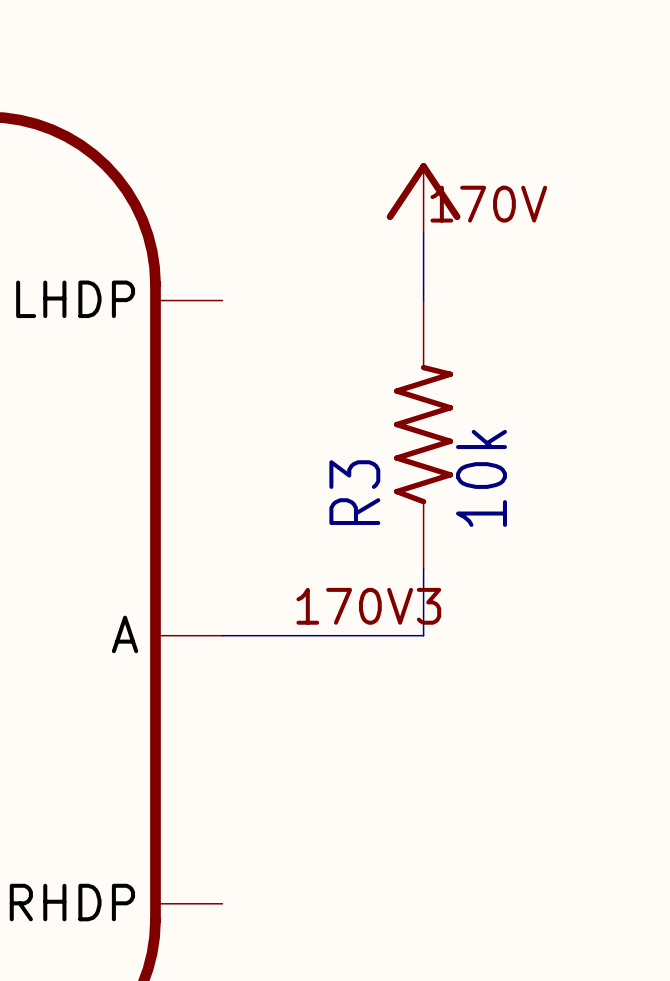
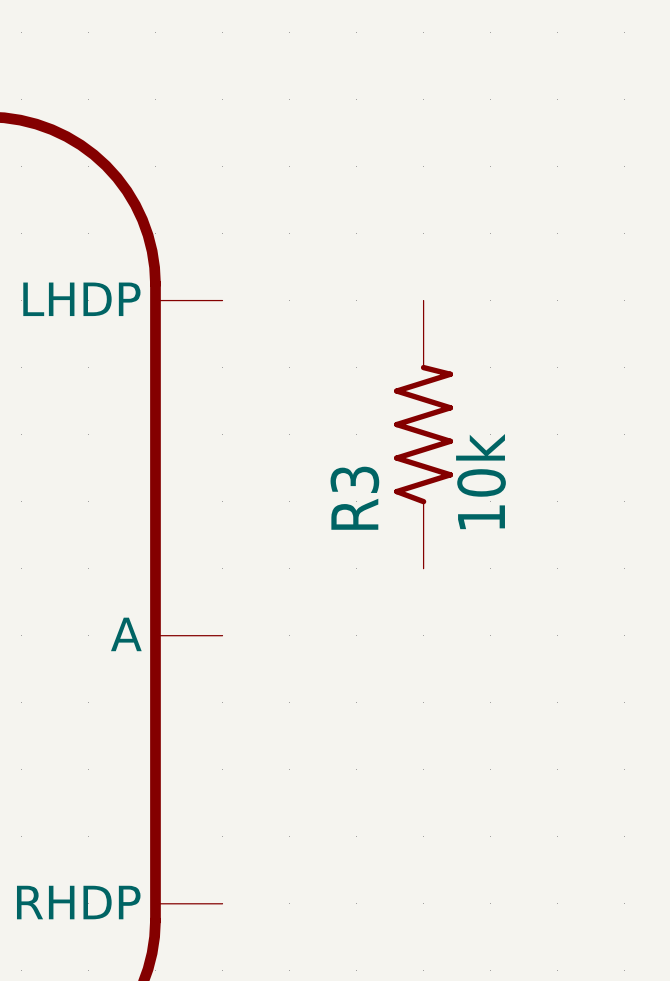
power symbol: (423, 198) -> none
label: 170V (488, 204) -> none
wire: (423, 233) (423, 300) -> none
wire: (423, 568) (423, 635) (222, 635) -> none
label: 170V3 (368, 606) -> none

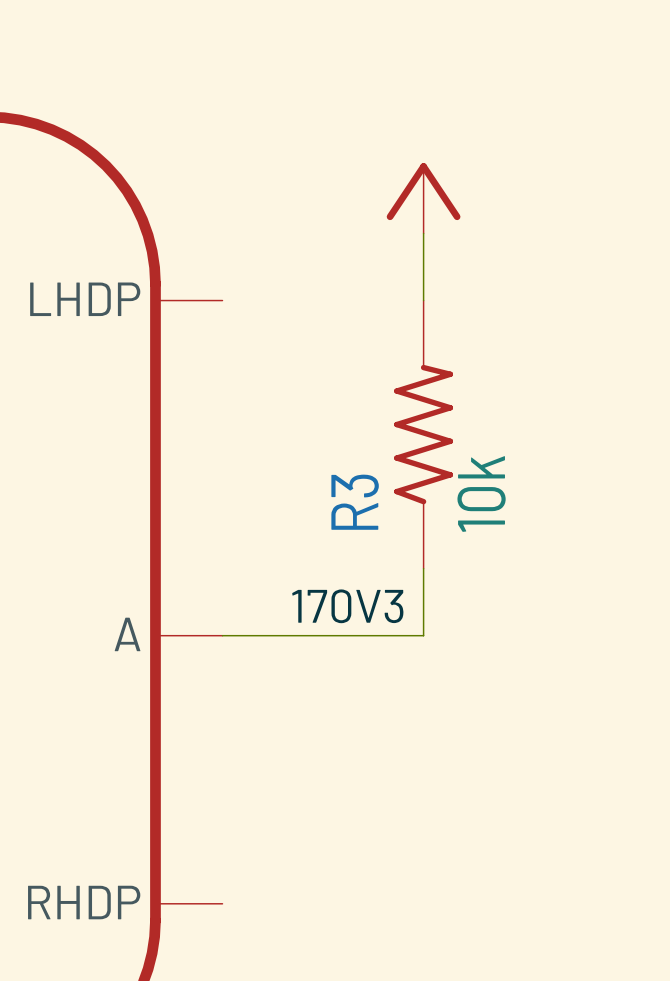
power symbol: none -> (423, 198)
wire: none -> (423, 233) (423, 300)
wire: none -> (423, 568) (423, 635) (222, 635)
label: none -> 170V3 (347, 606)

